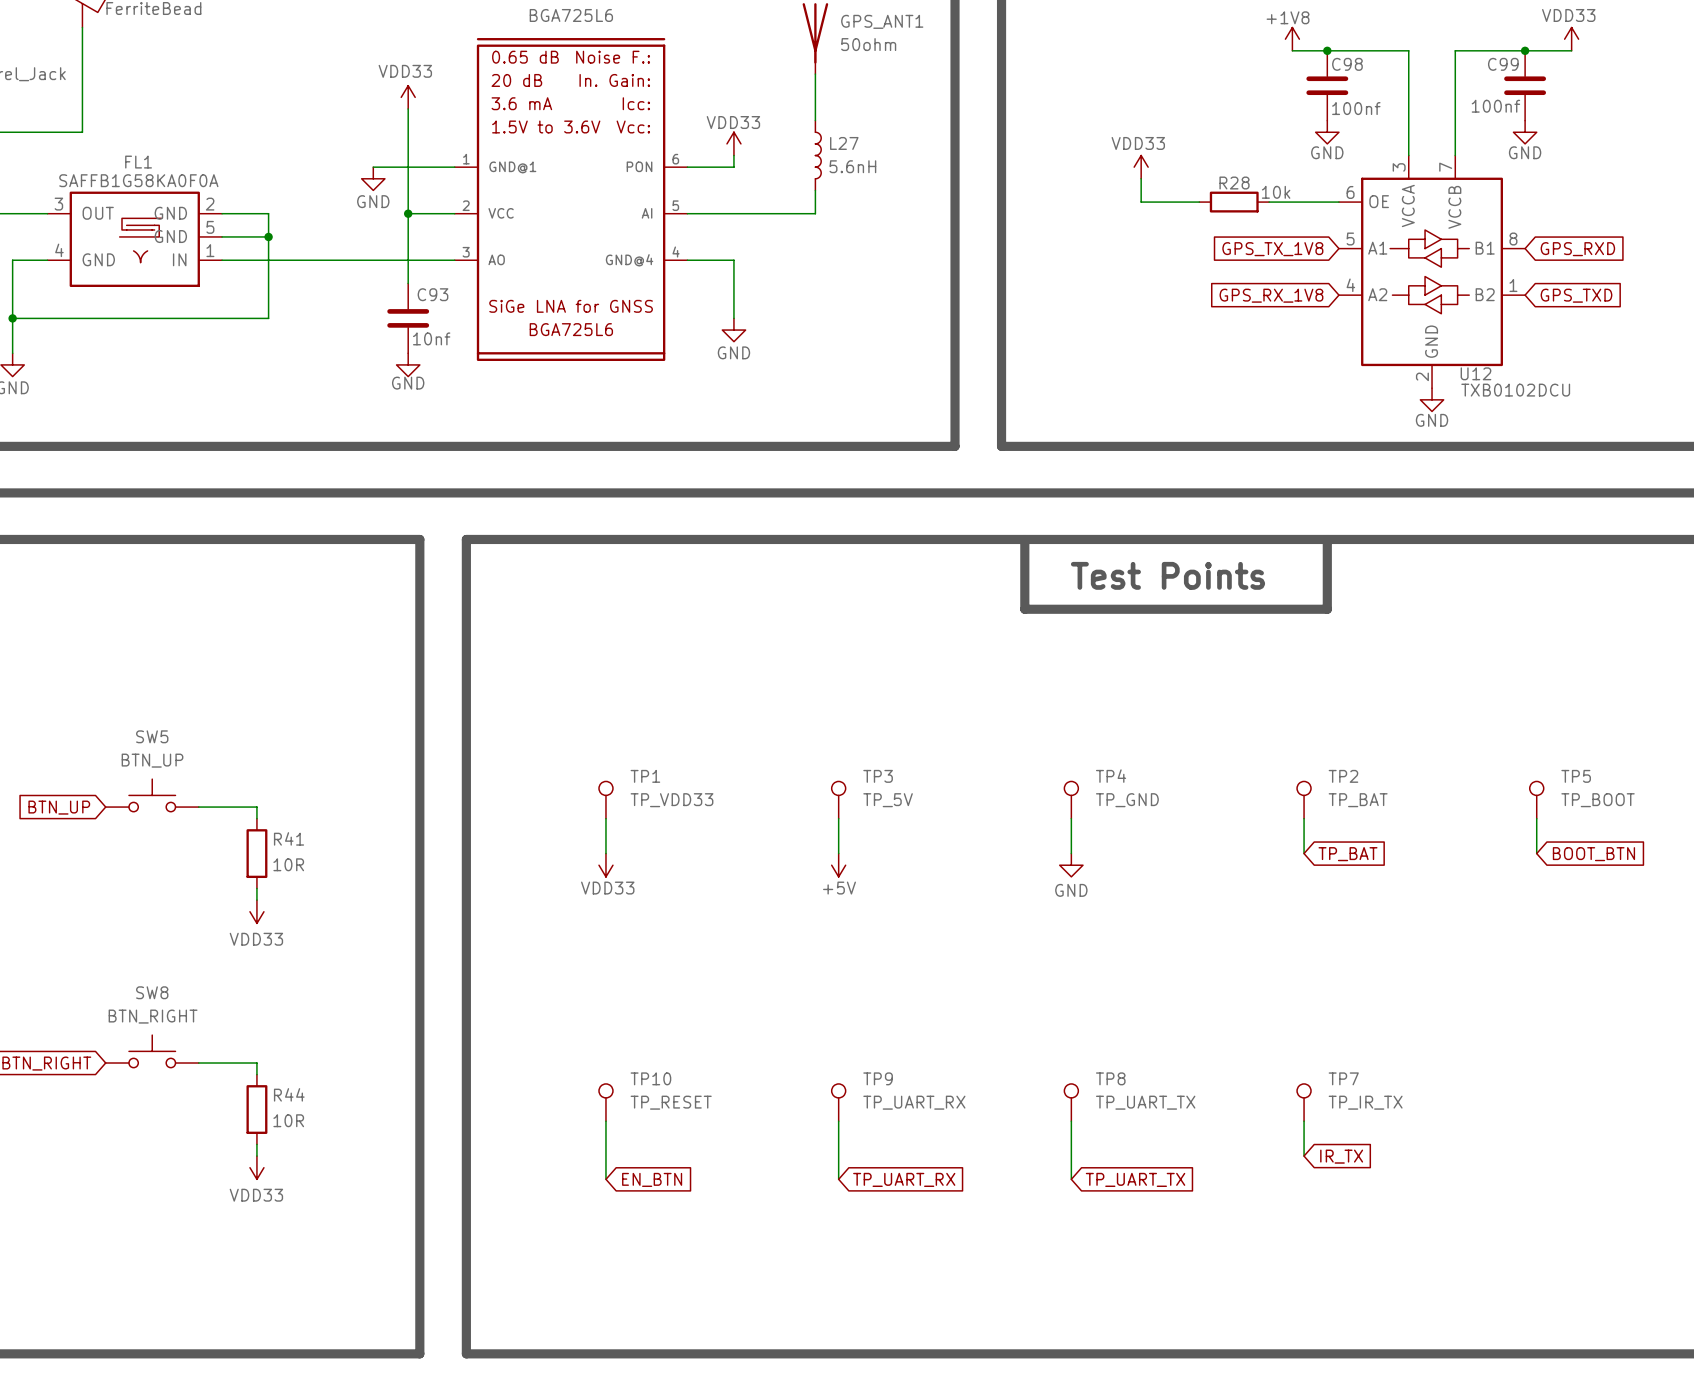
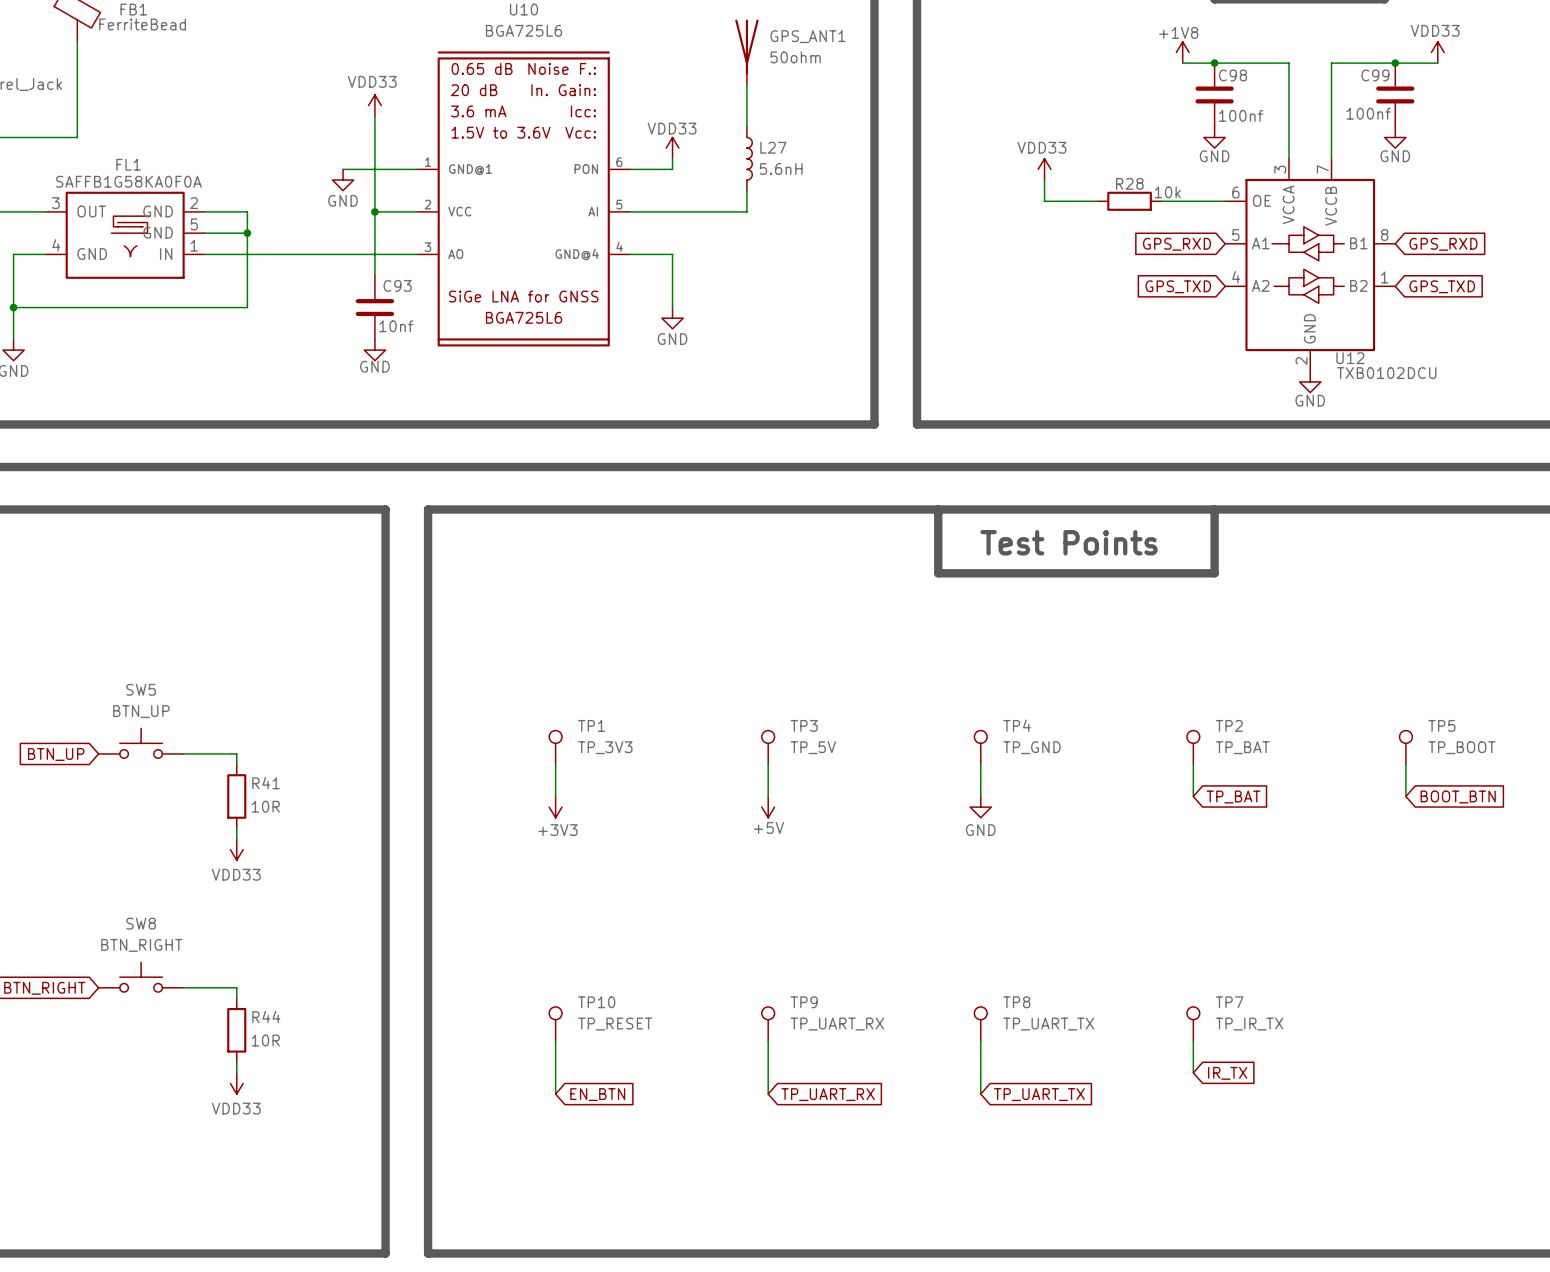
global label: GPS_TX_1V8 (1272, 249) -> GPS_RXD (1177, 244)
global label: GPS_RX_1V8 (1271, 295) -> GPS_TXD (1178, 286)
TP1 value: TP_VDD33 (671, 800) -> TP_3V3 (605, 747)
power symbol: VDD33 (605, 865) -> +3V3 (555, 807)

